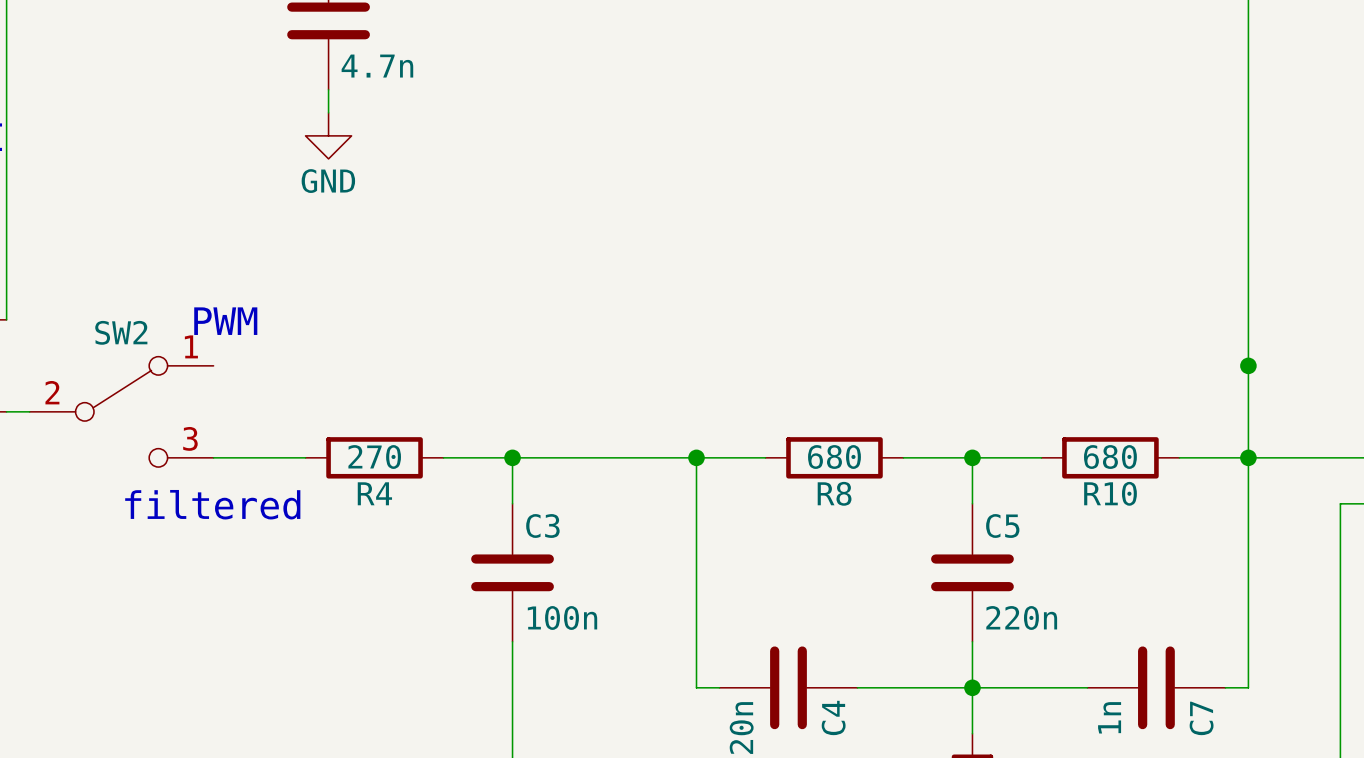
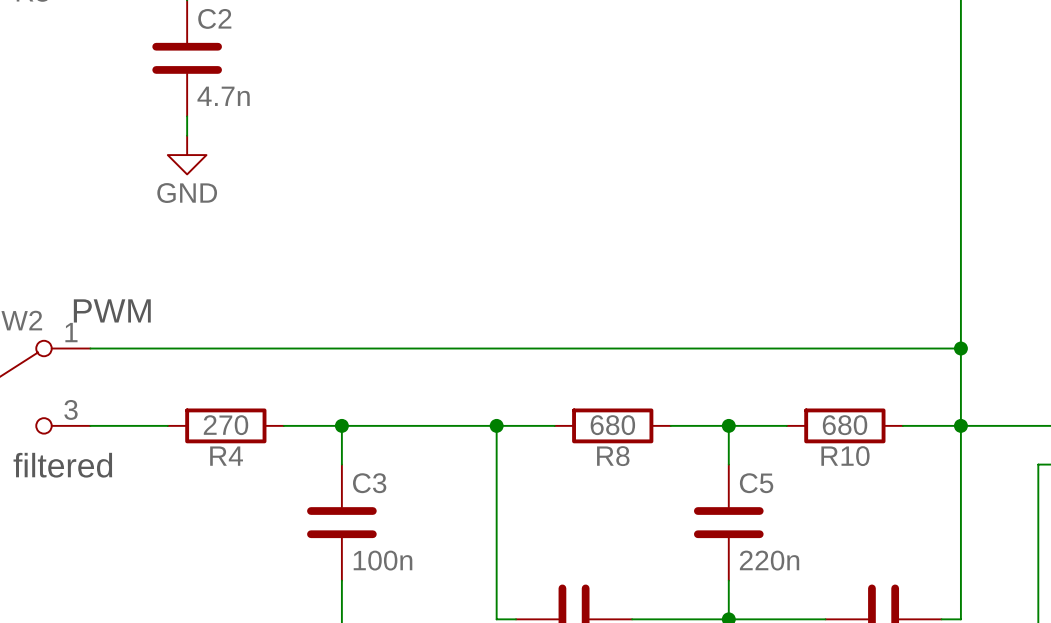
wire: none -> (90, 348) (960, 348)

